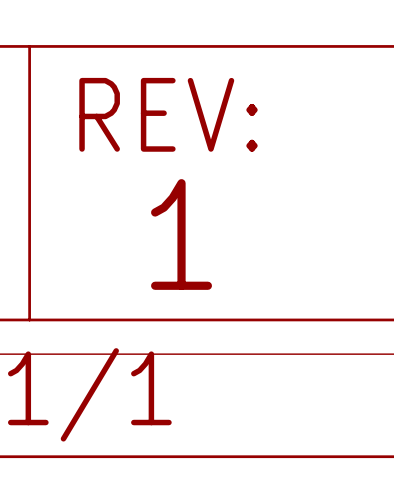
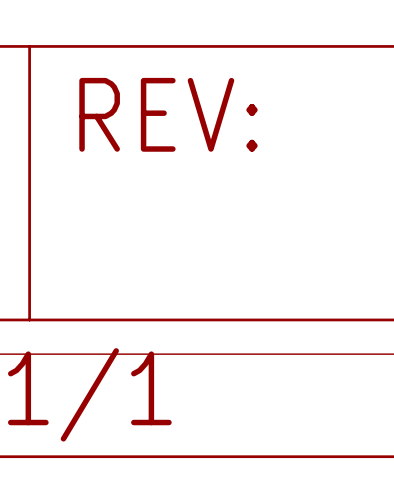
text: 1 (181, 234) -> none

